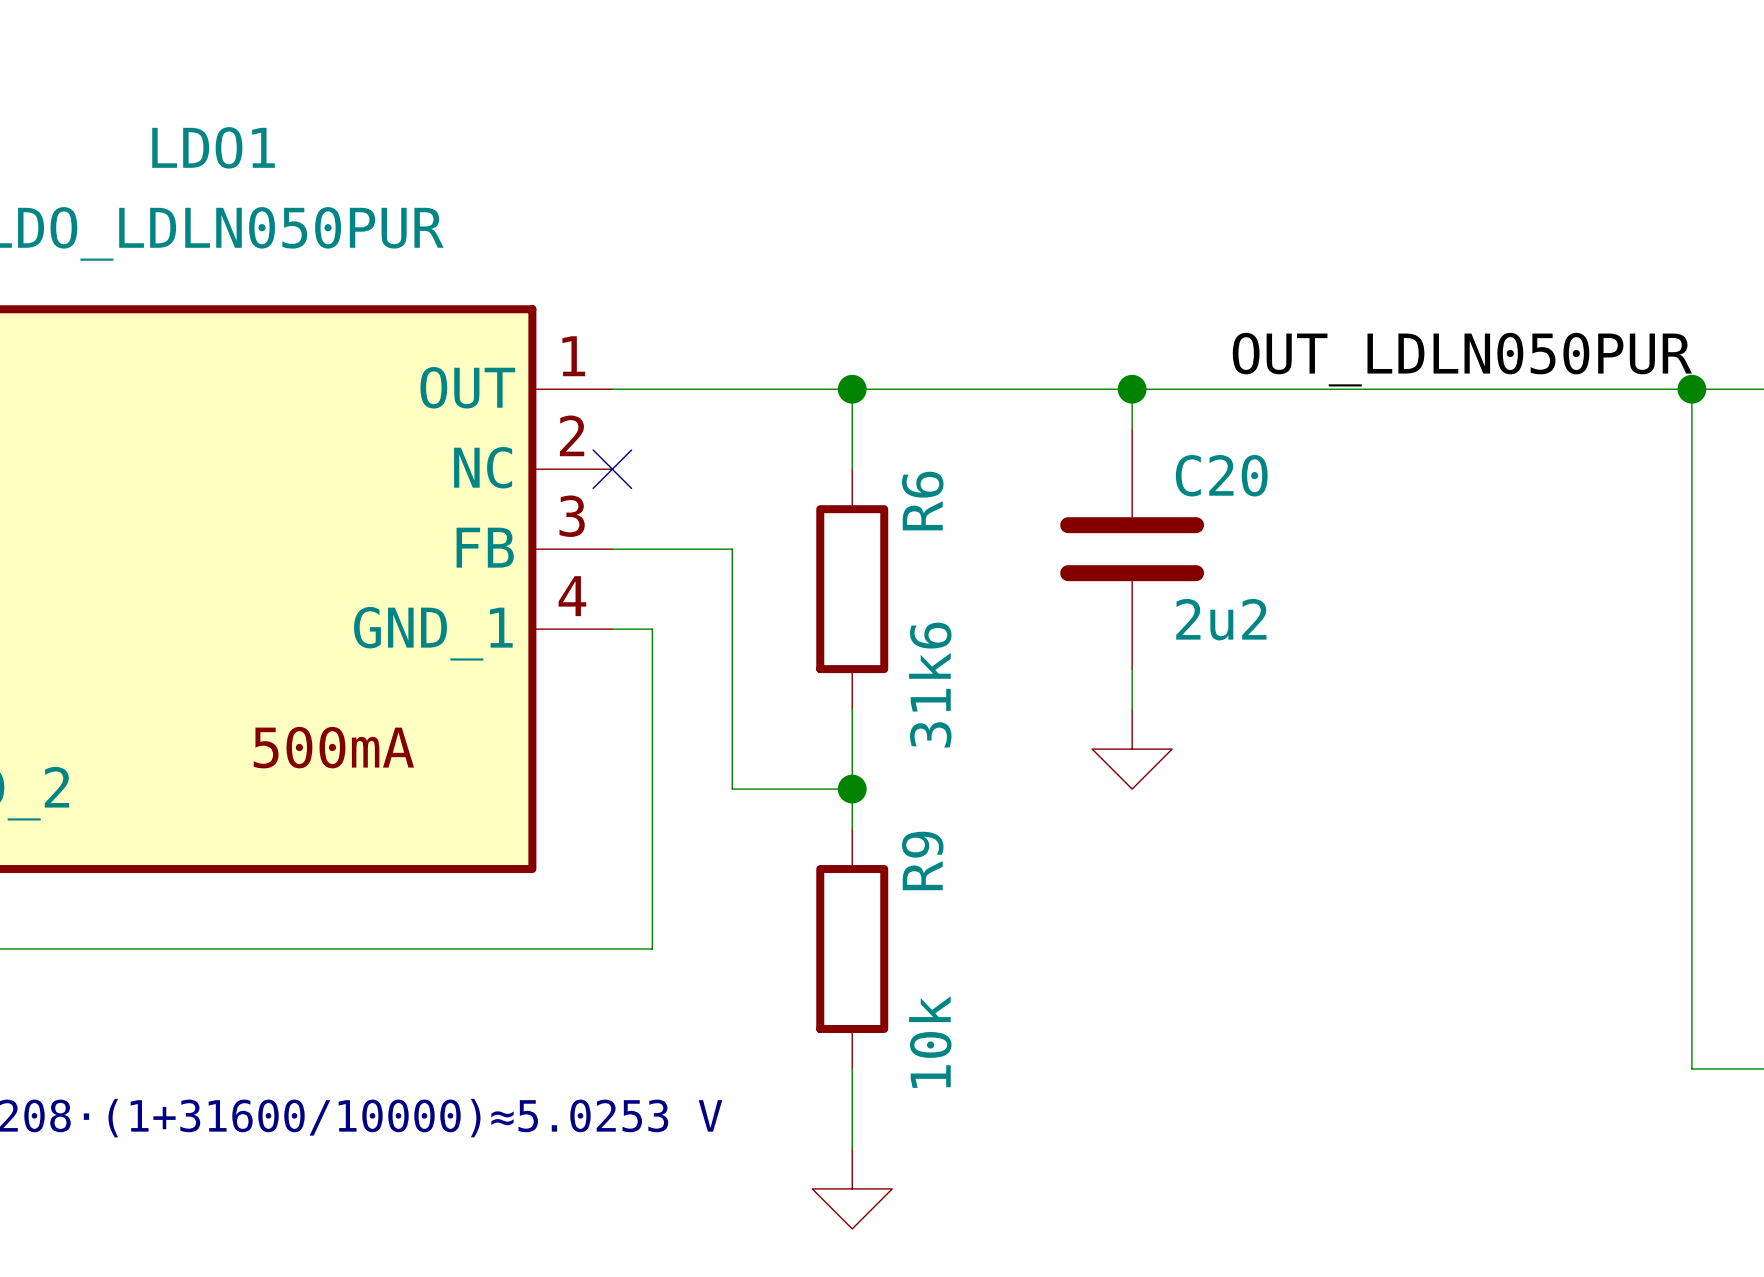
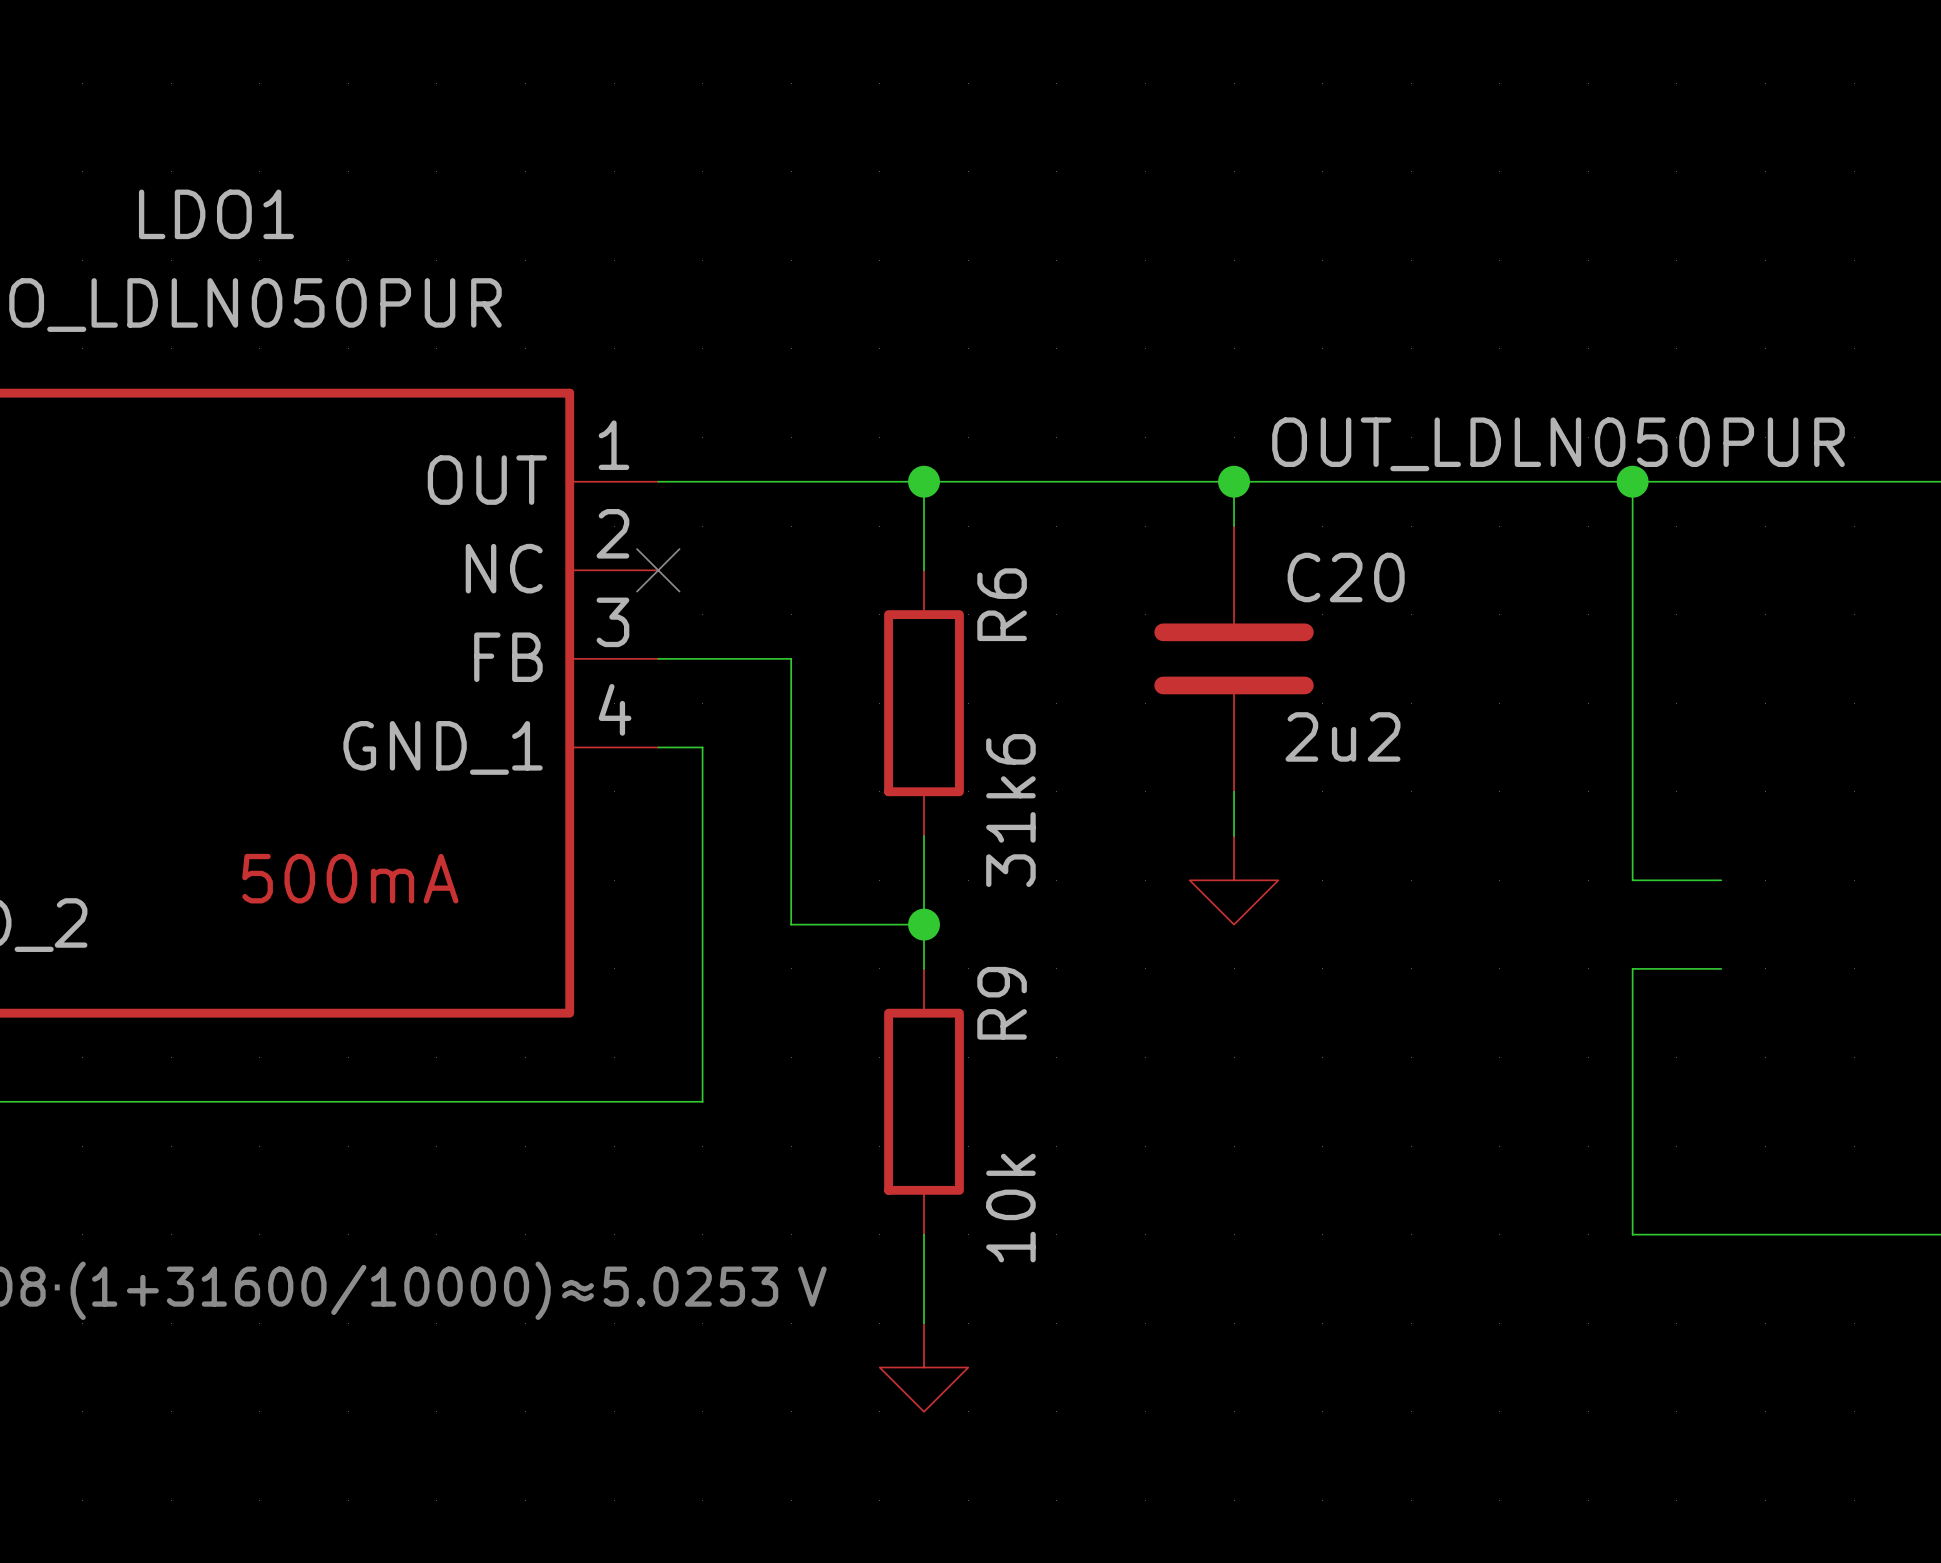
wire: none -> (1632, 481) (1632, 880) (1721, 880)
junction: none -> (1632, 481)
wire: (1691, 389) (1691, 1068) -> (1721, 968) (1632, 968) (1632, 1234) (1854, 1234)
junction: (1691, 389) -> none

